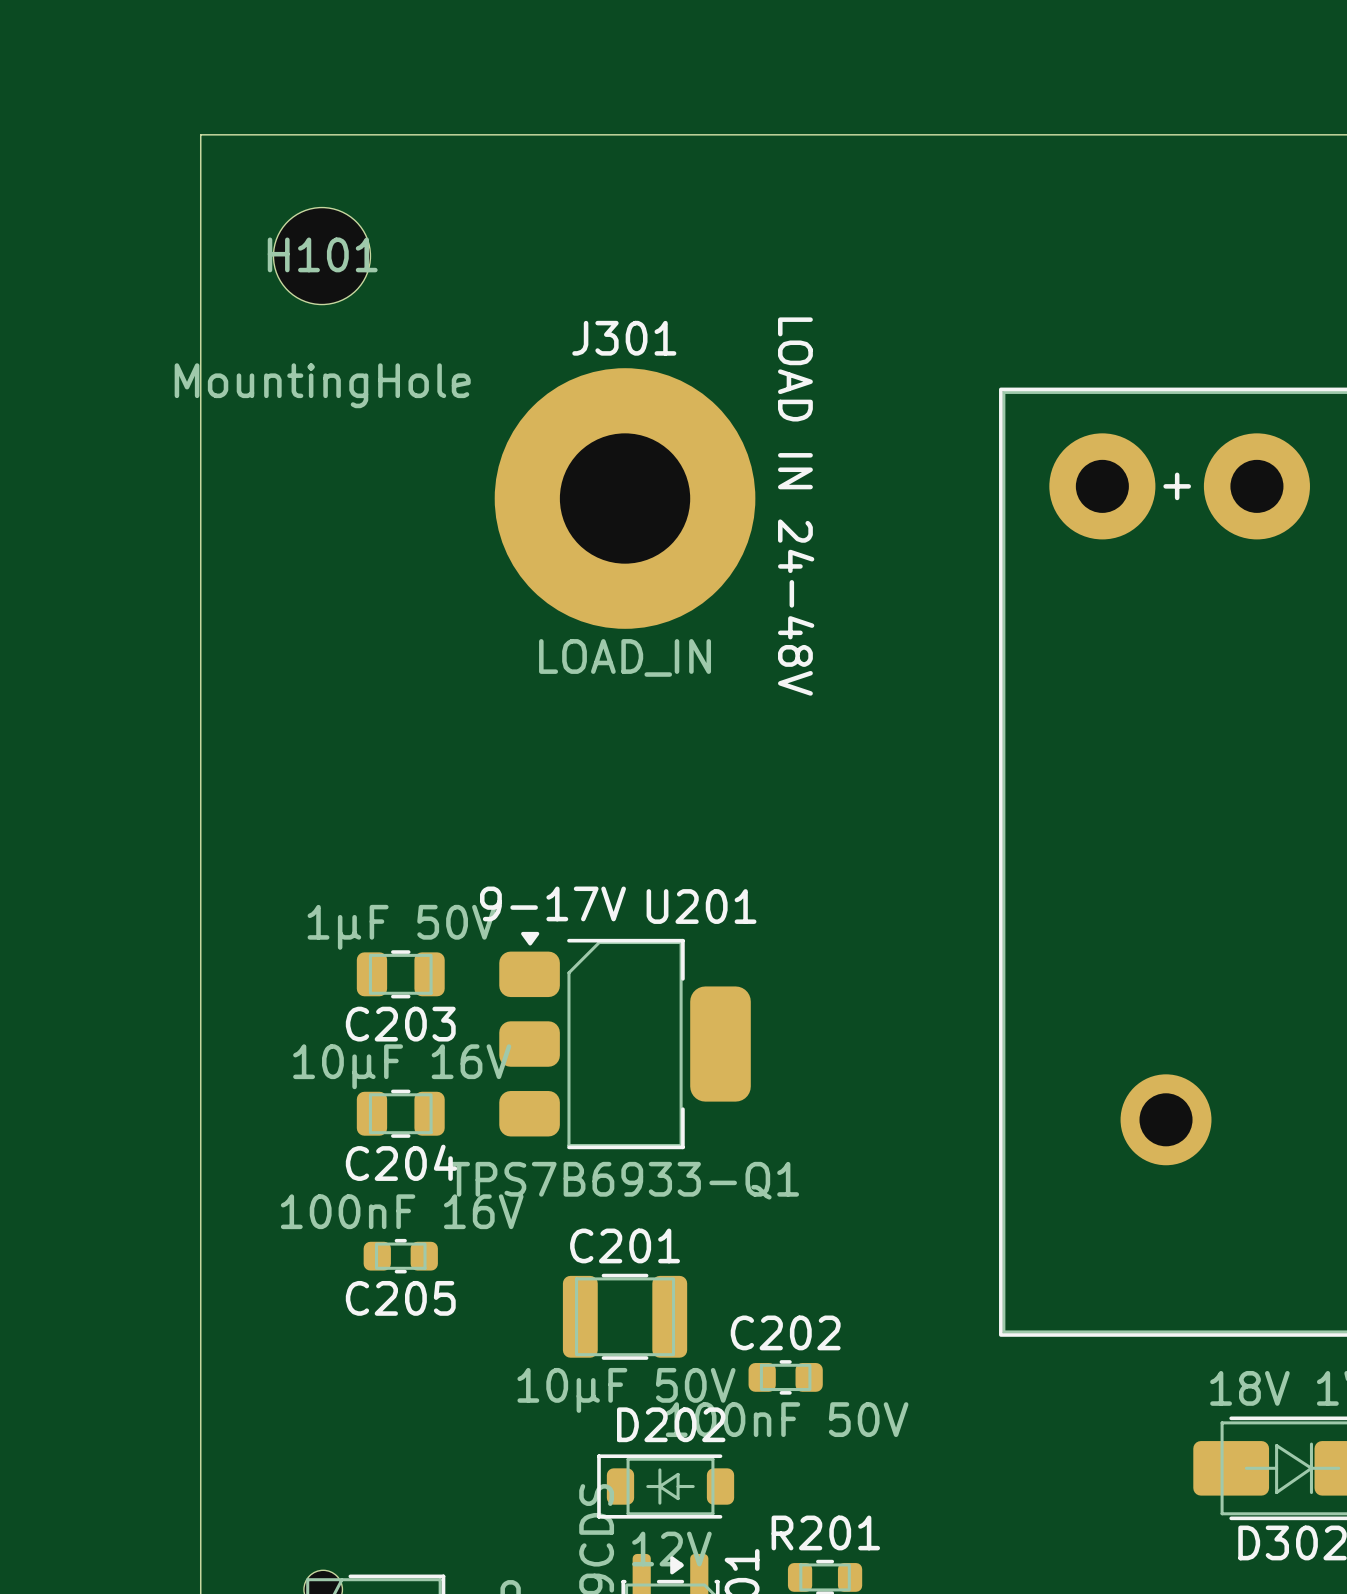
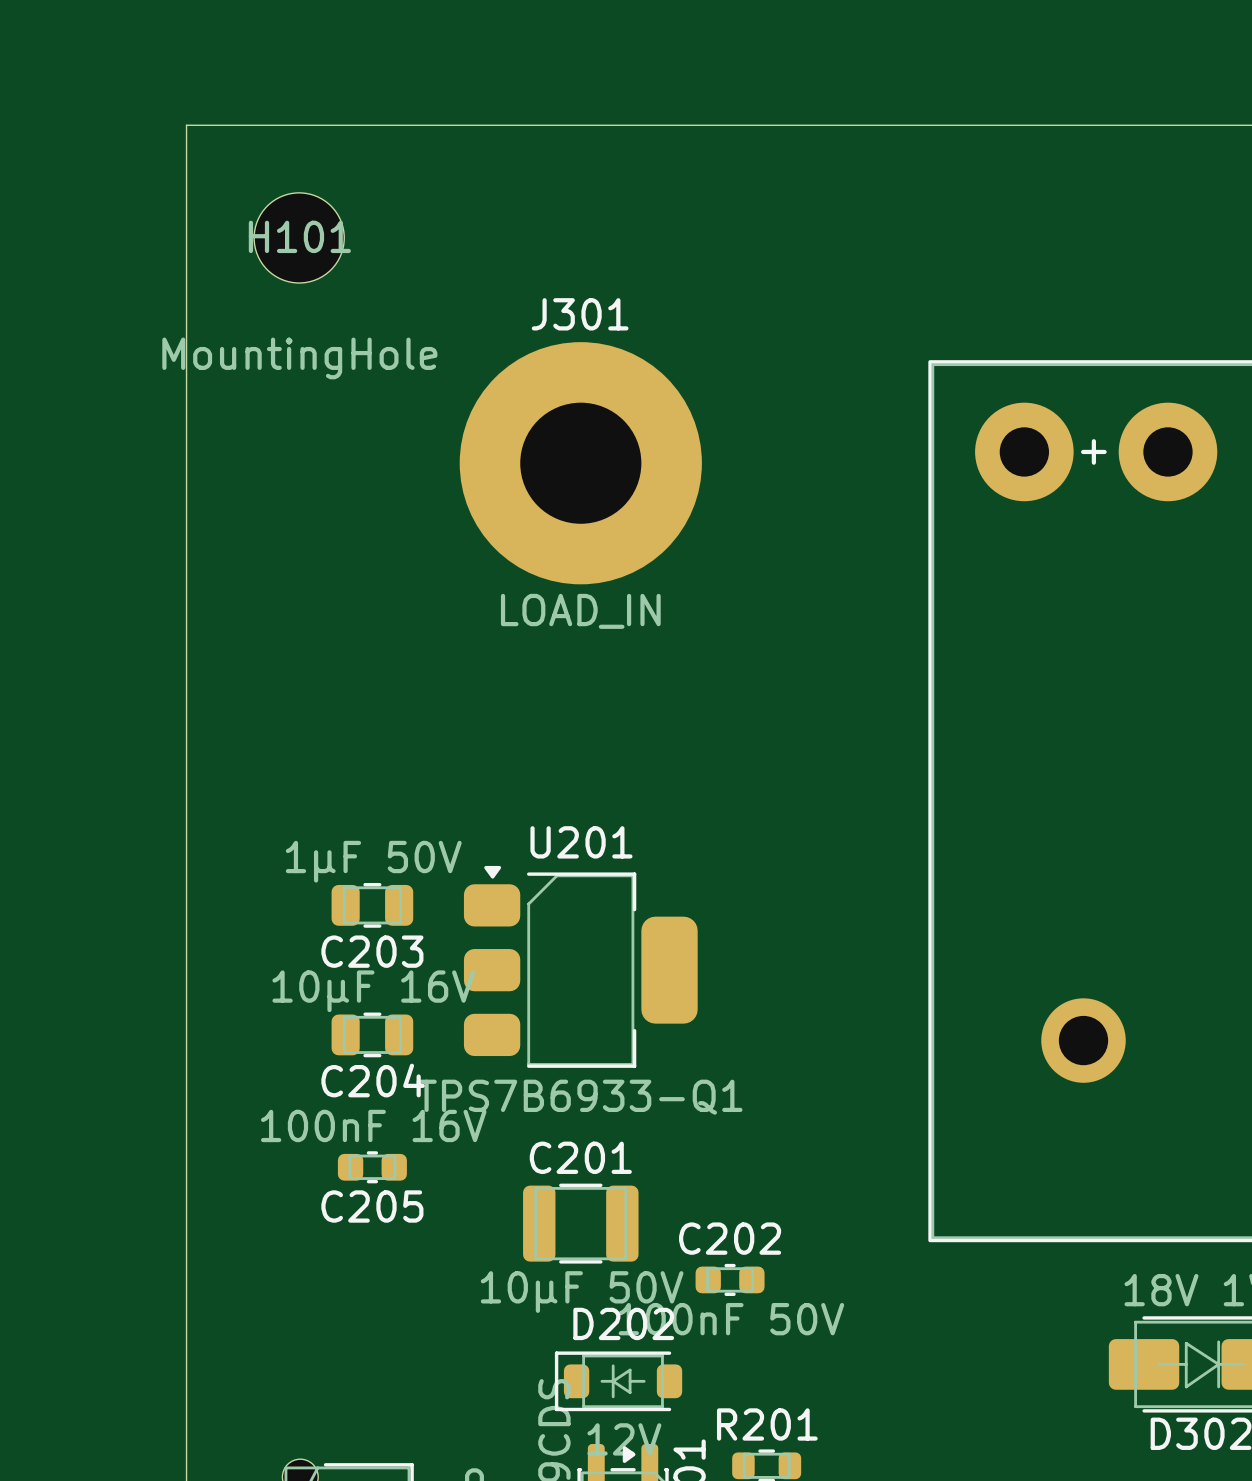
text: LOAD IN 24-48V (796, 506) -> none
text: 9-17V (552, 903) -> none
U201 name position: U201 (701, 906) -> U201 (581, 842)

